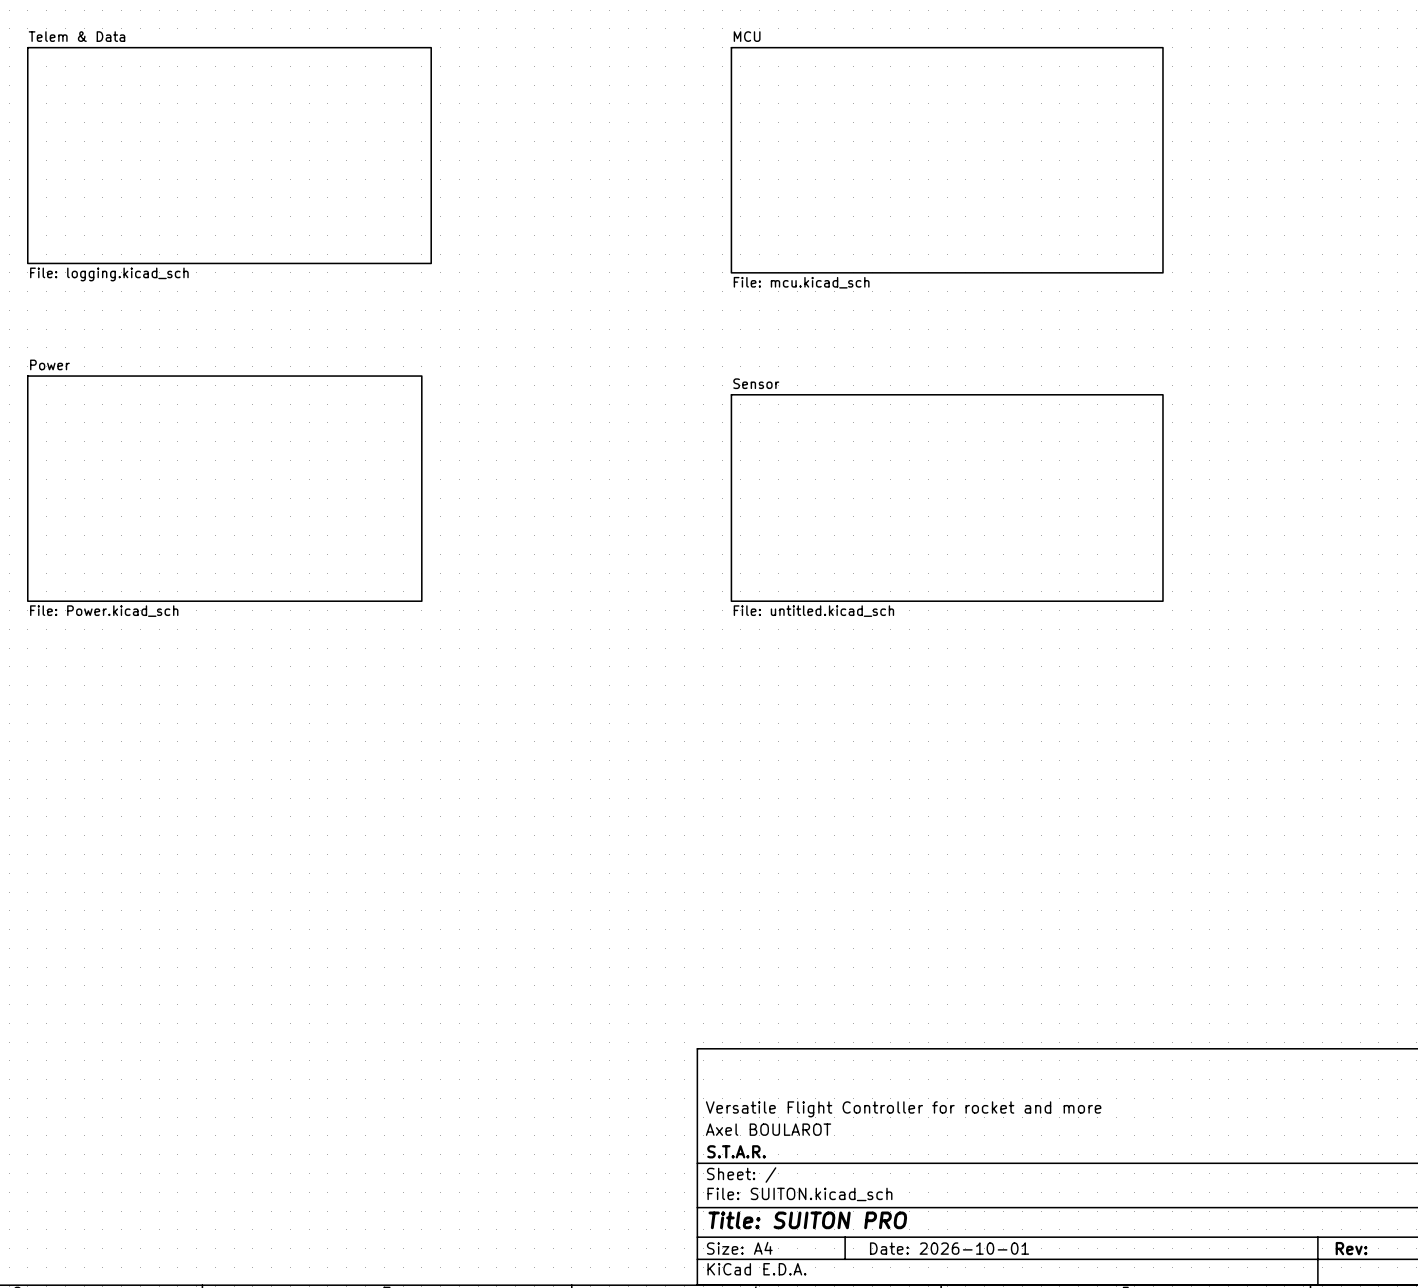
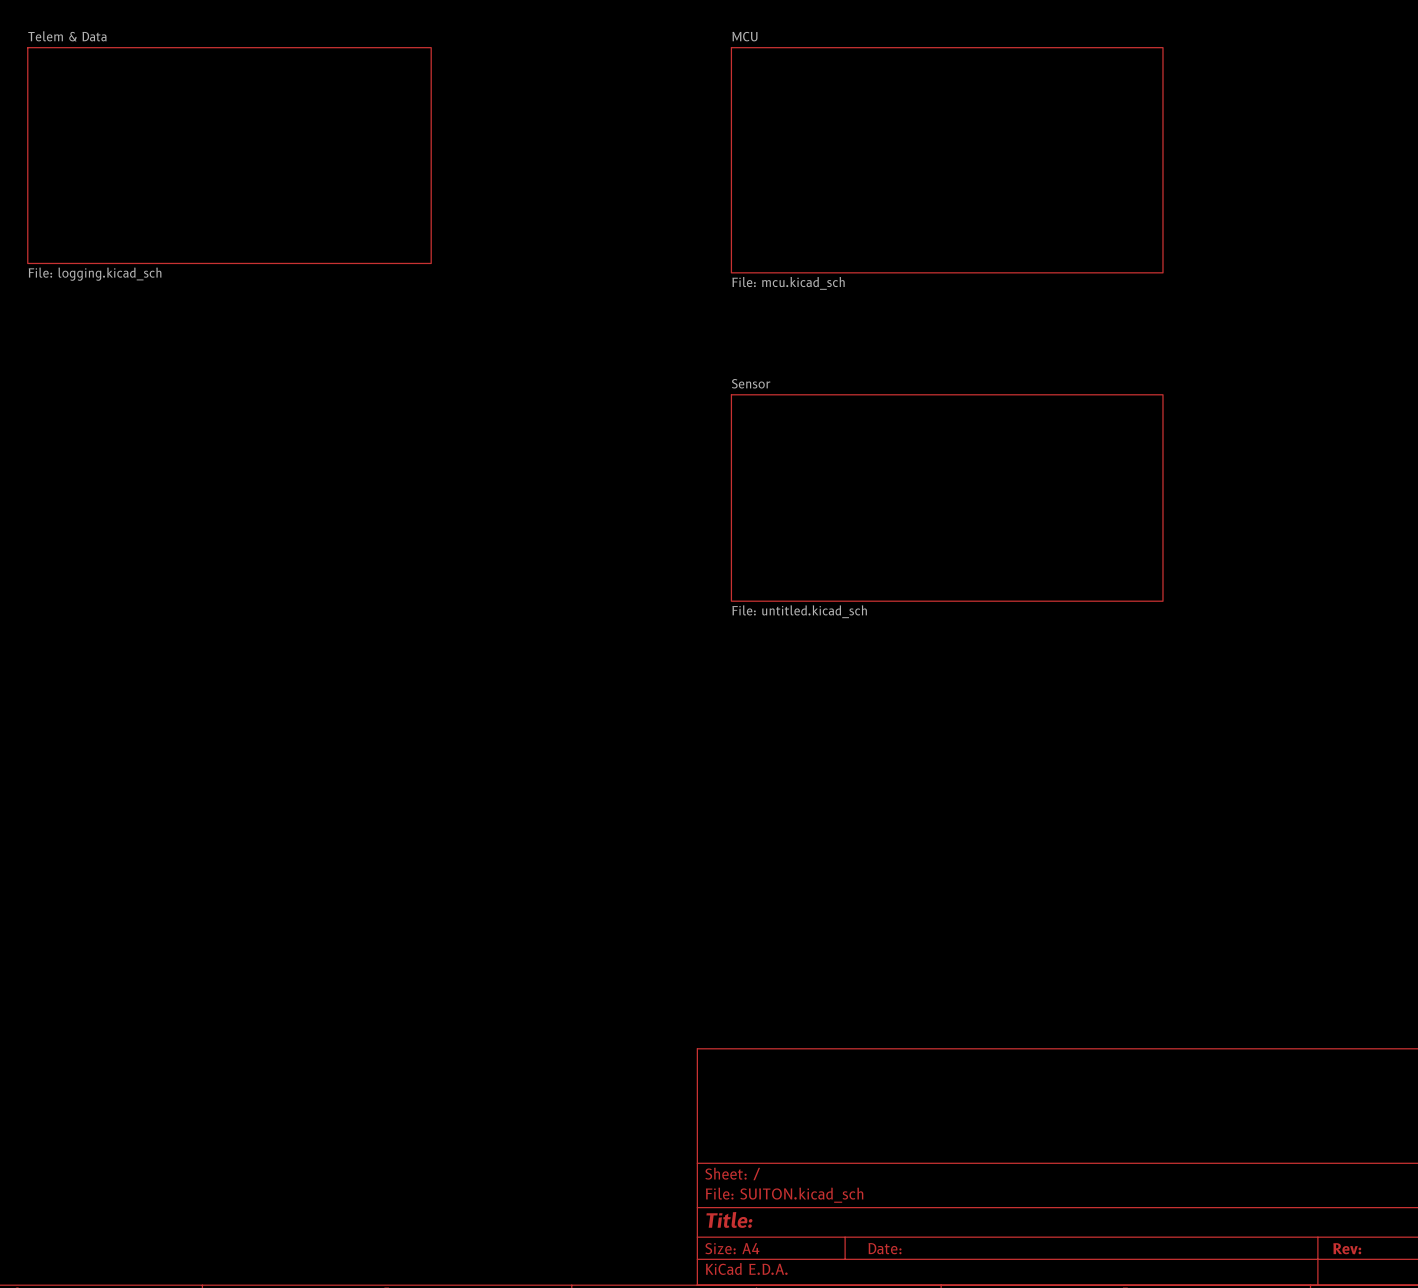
sheet Power: File: Power.kicad_sch (224, 488) -> none
title block: Versatile Flight Controller for rocket and more (903, 1109) -> none
title block: Axel BOULAROT (768, 1129) -> none
title block: S.T.A.R. (736, 1151) -> none
title block: Title: SUITON PRO (807, 1220) -> Title: (729, 1219)
title block: Date: 2026-10-01 (949, 1248) -> Date: (885, 1248)

